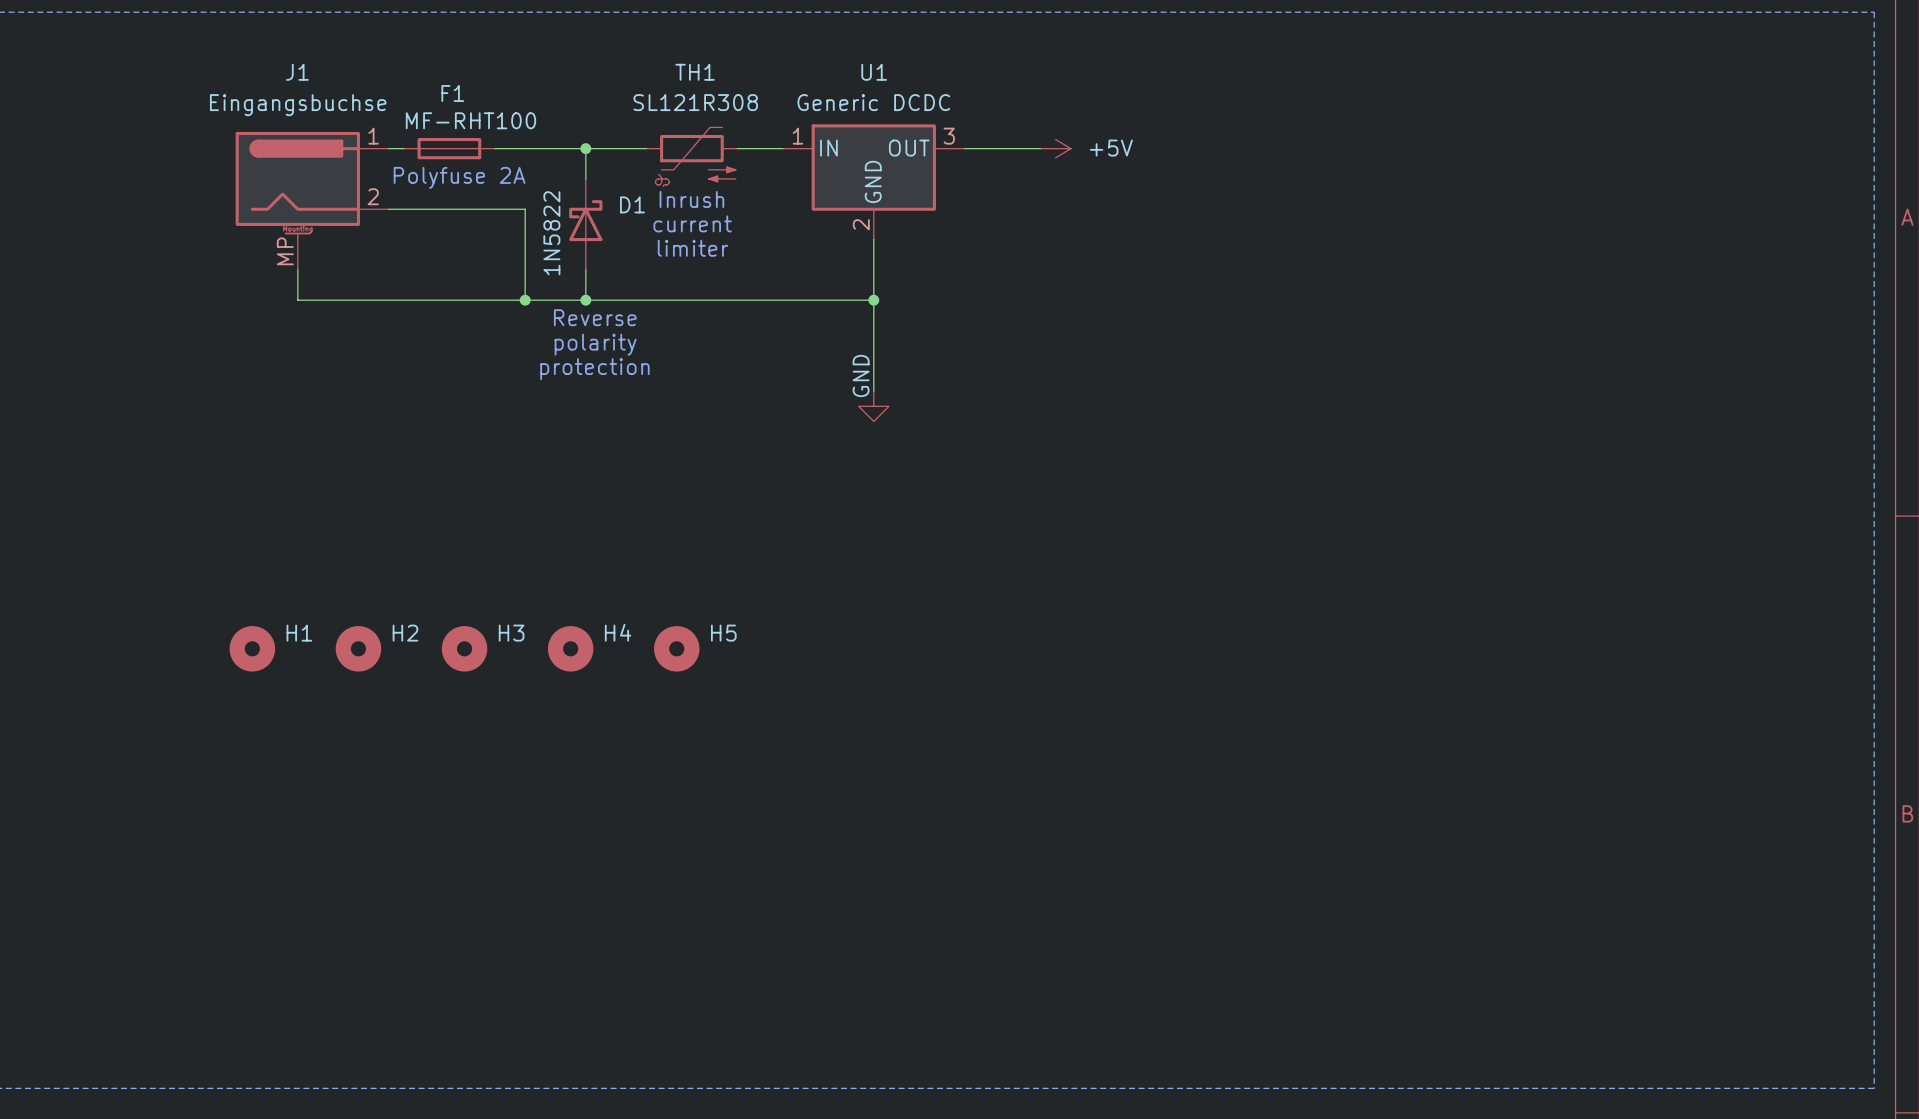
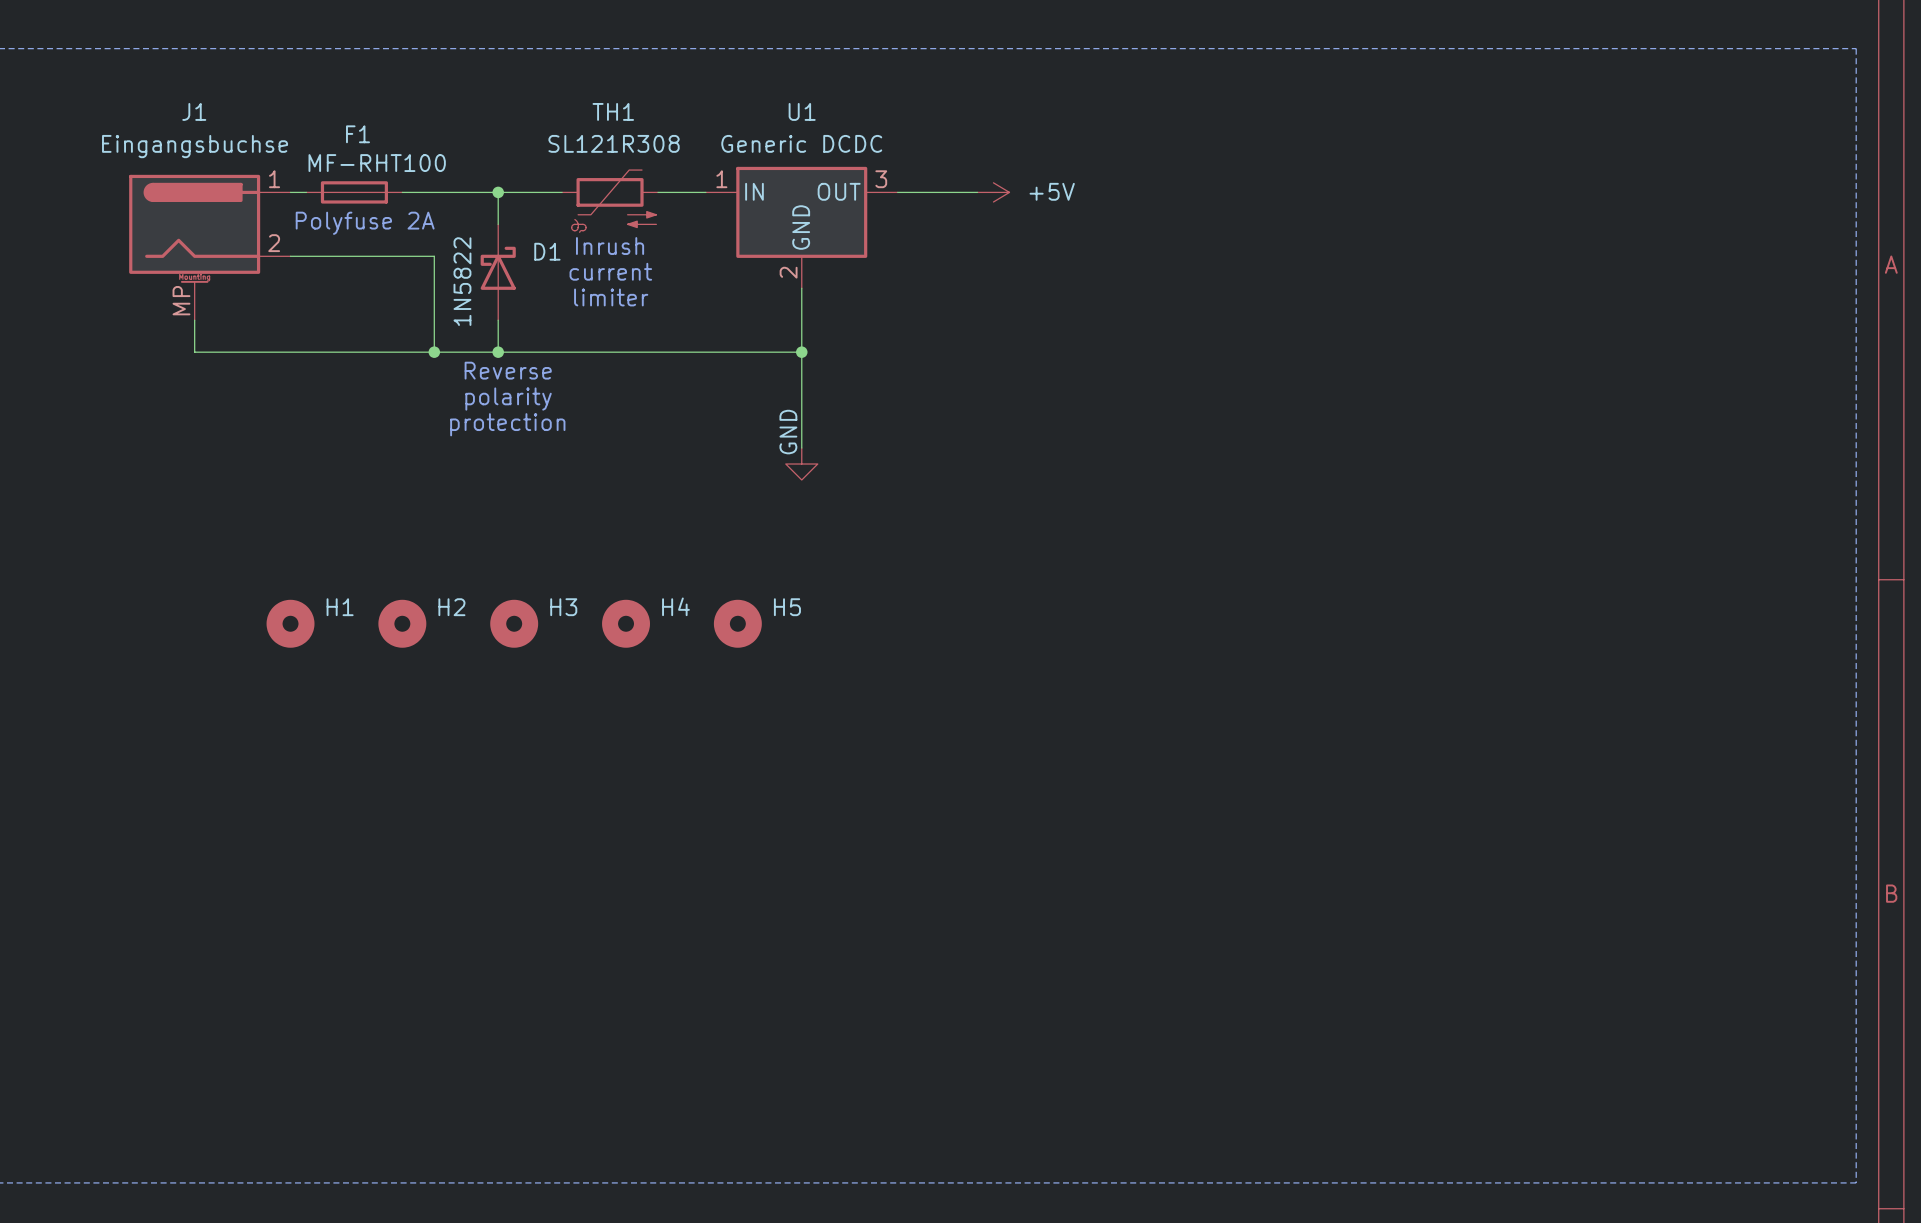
H1 position: (252, 648) -> (290, 623)
H2 position: (358, 648) -> (402, 623)
H3 position: (464, 648) -> (514, 623)
H4 position: (570, 648) -> (626, 623)
H5 position: (676, 648) -> (737, 623)

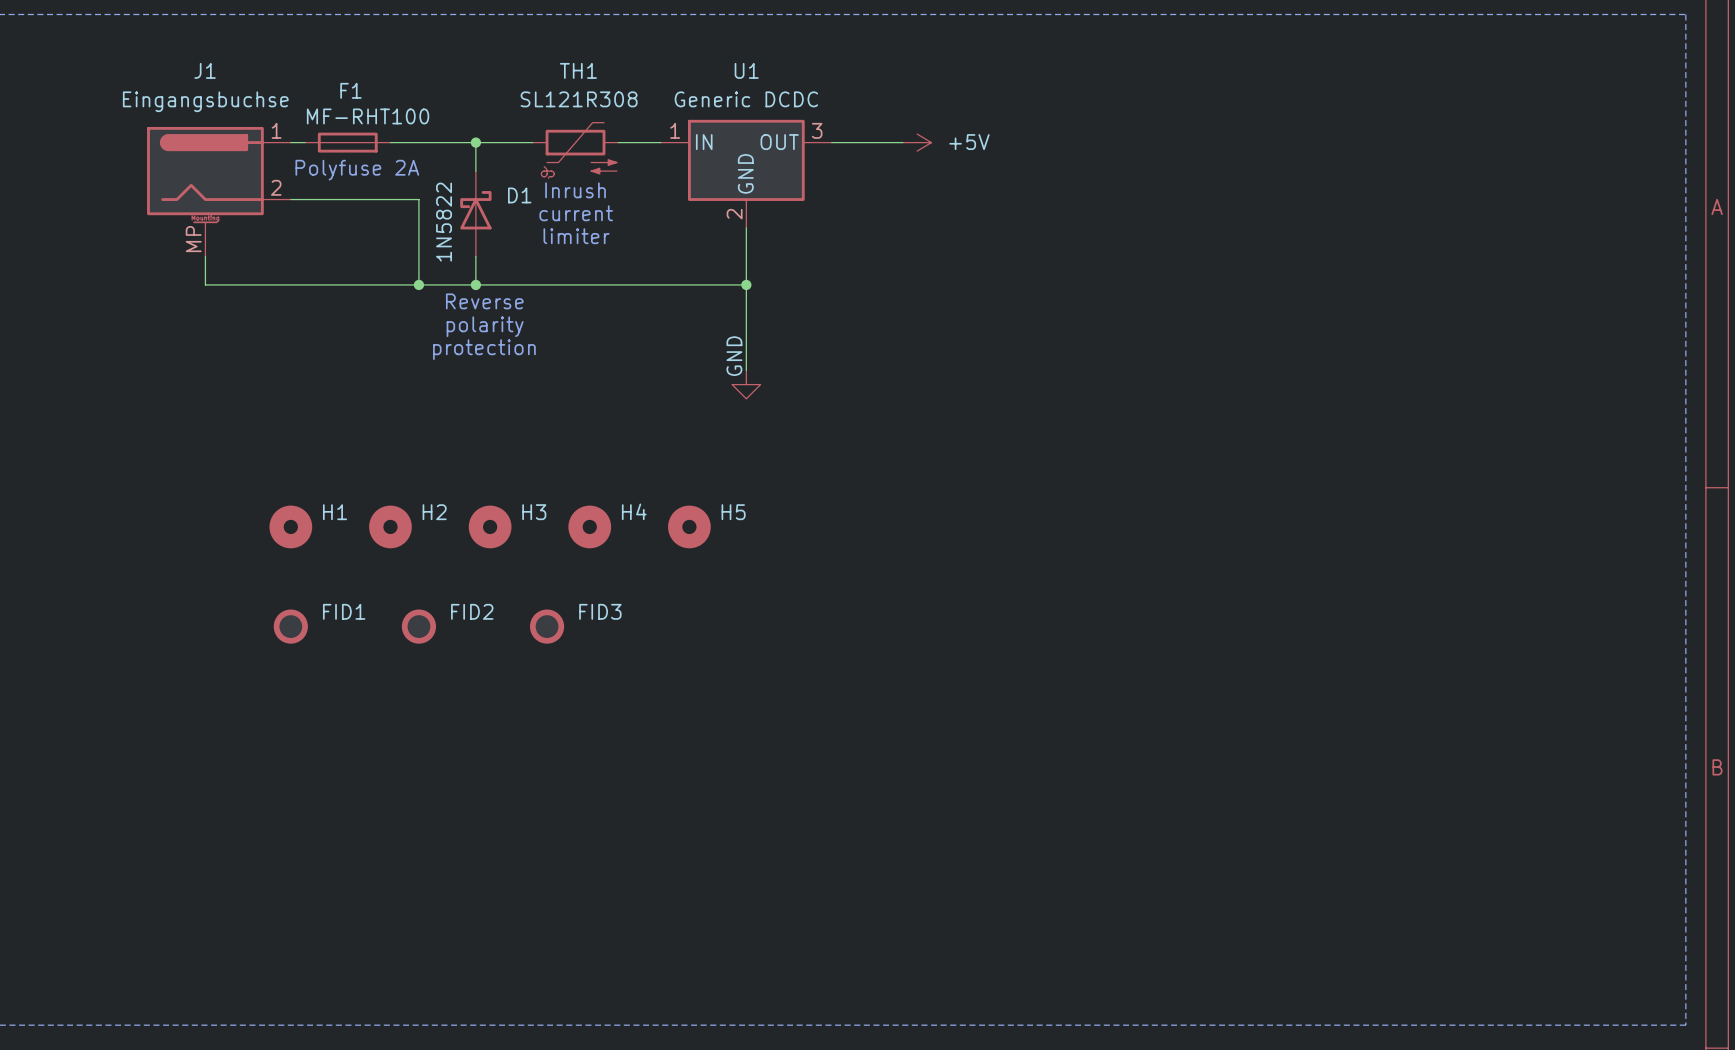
FID1: none -> (290, 626)
FID2: none -> (418, 626)
FID3: none -> (547, 626)

